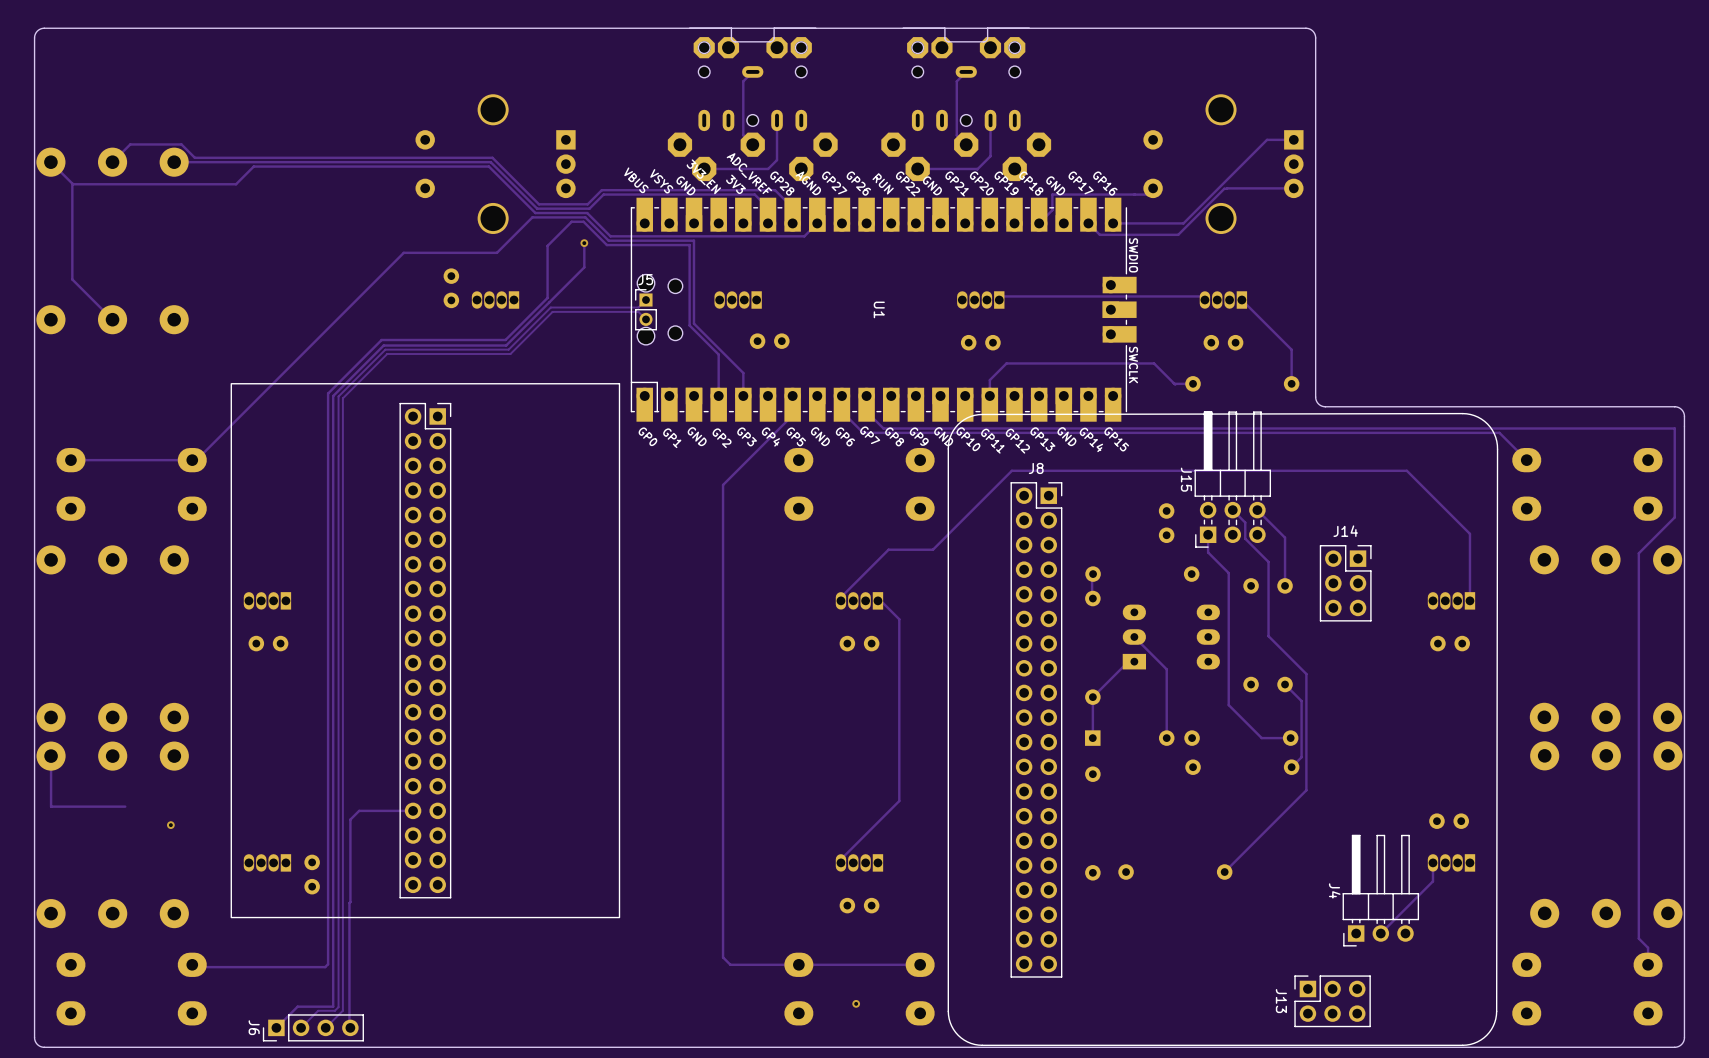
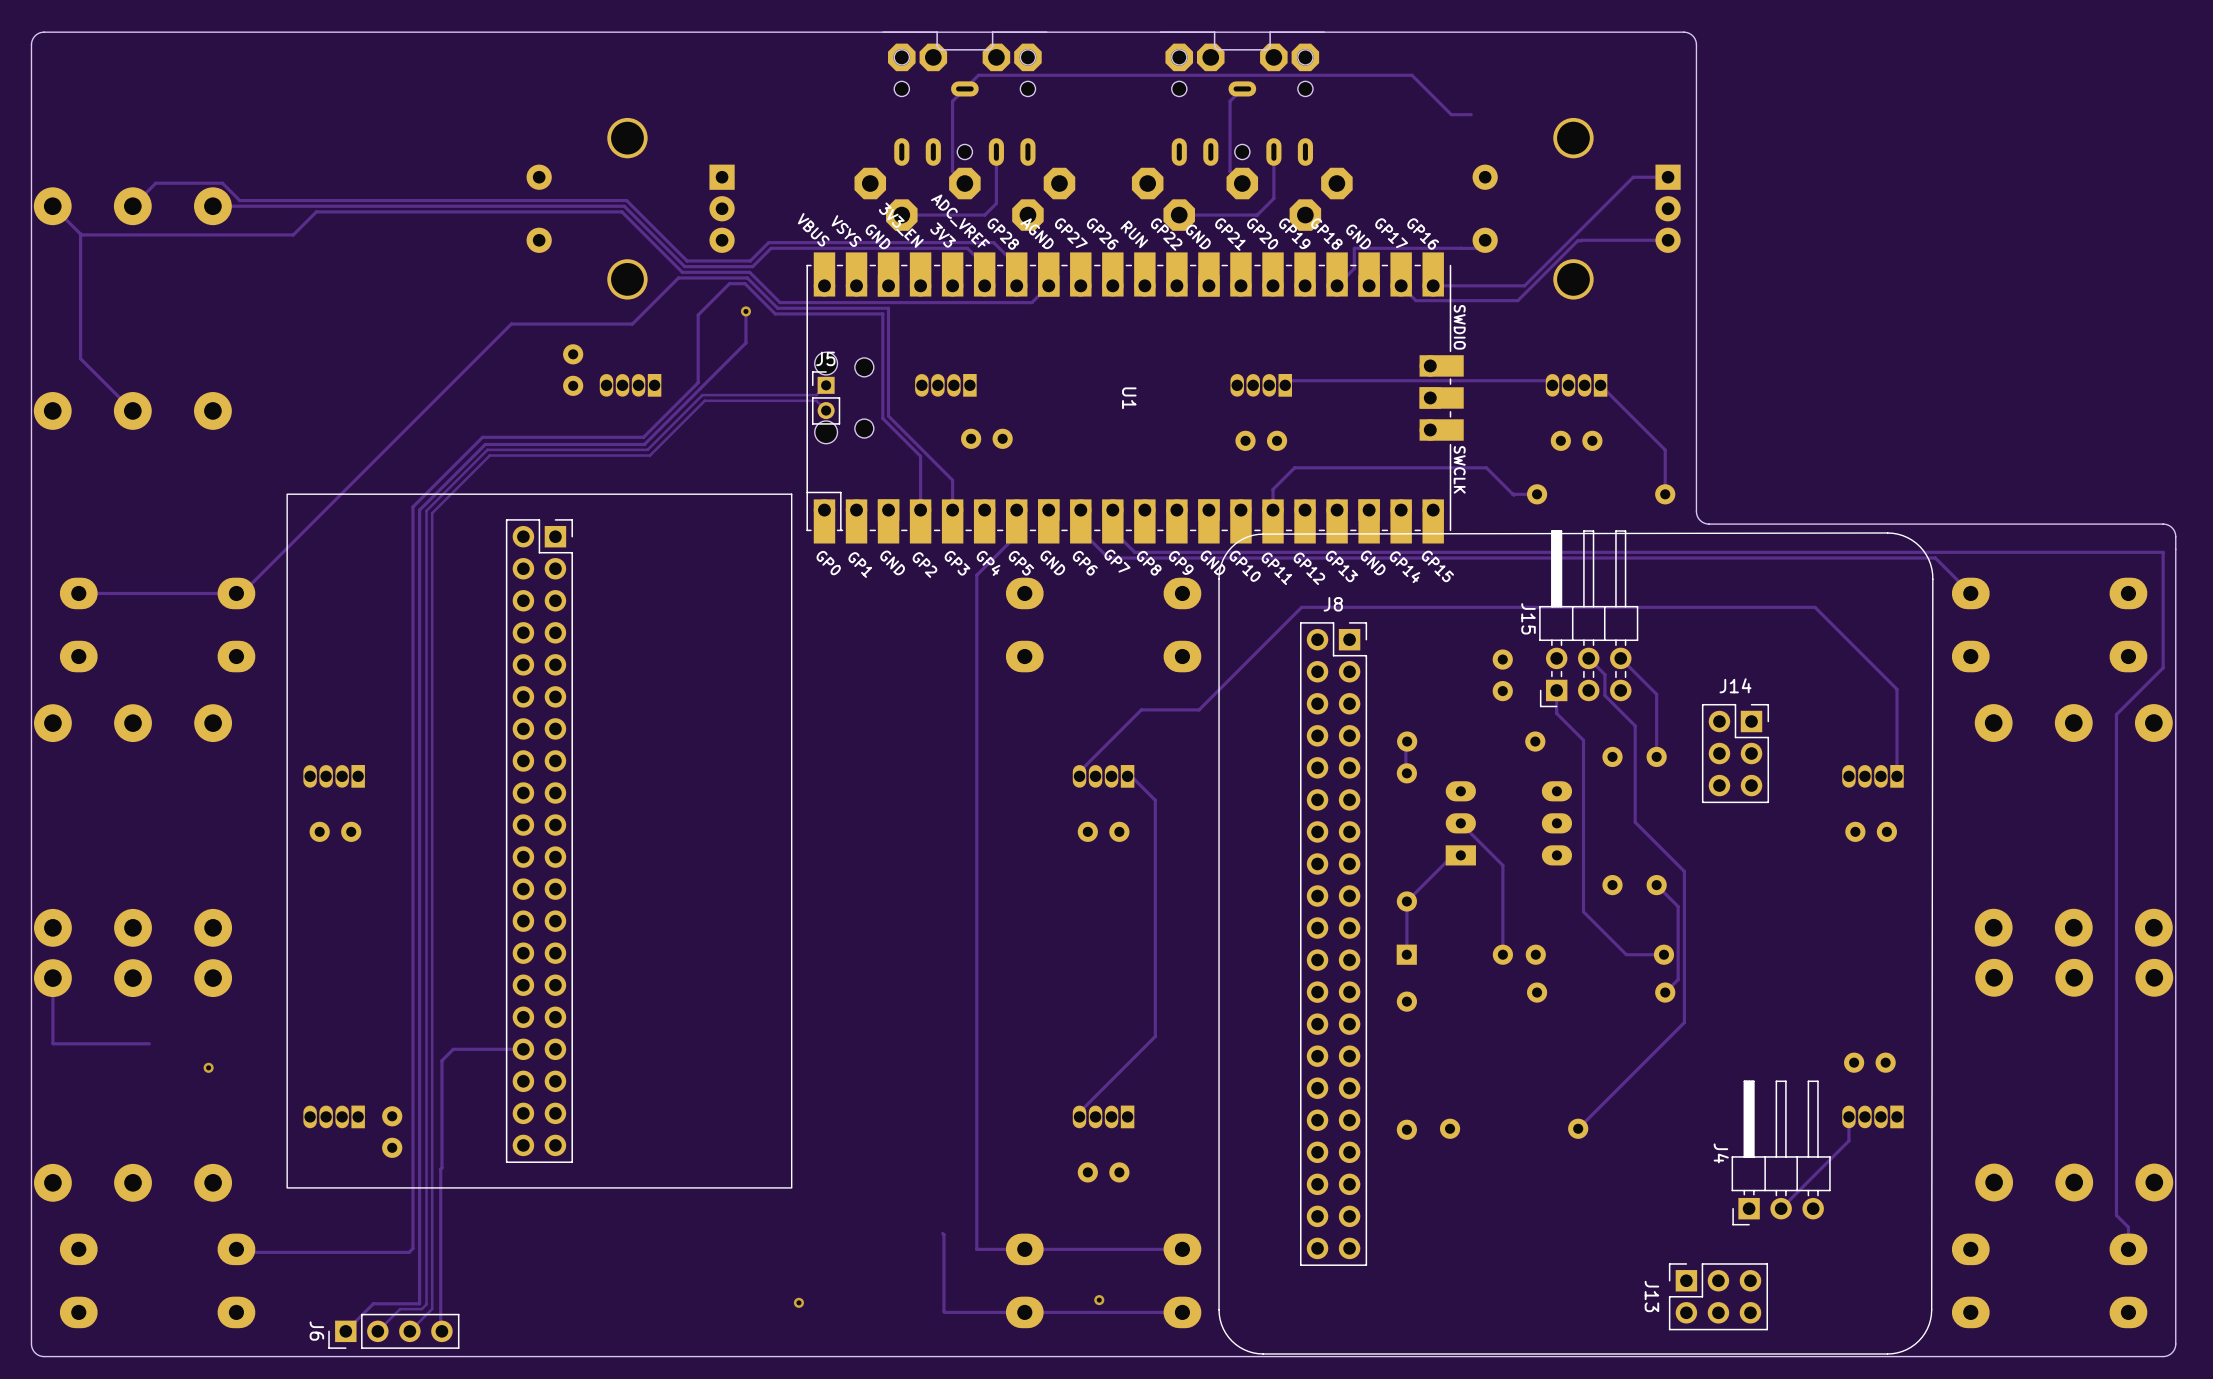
track: none -> (964, 88) (978, 75) (1411, 75) (1451, 114) (1471, 114)
track: (761, 446) (723, 484) (723, 957) (730, 964) (761, 964) -> (976, 575) (976, 1249)
track: none -> (942, 1233) (944, 1312) (1182, 1312)
via: none -> (798, 1302)

